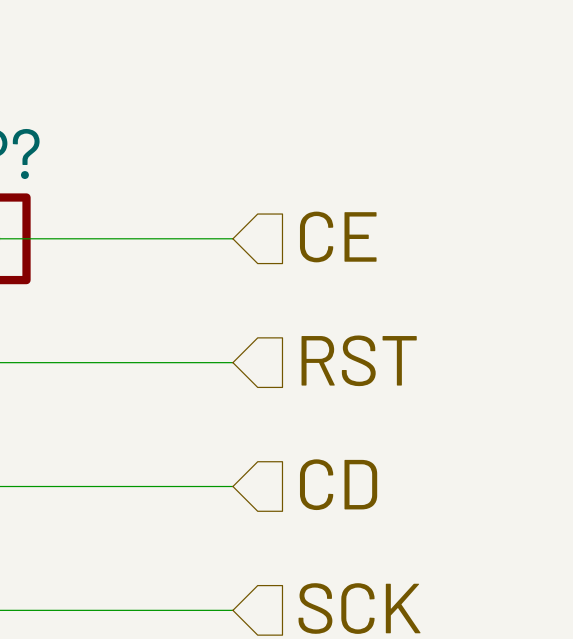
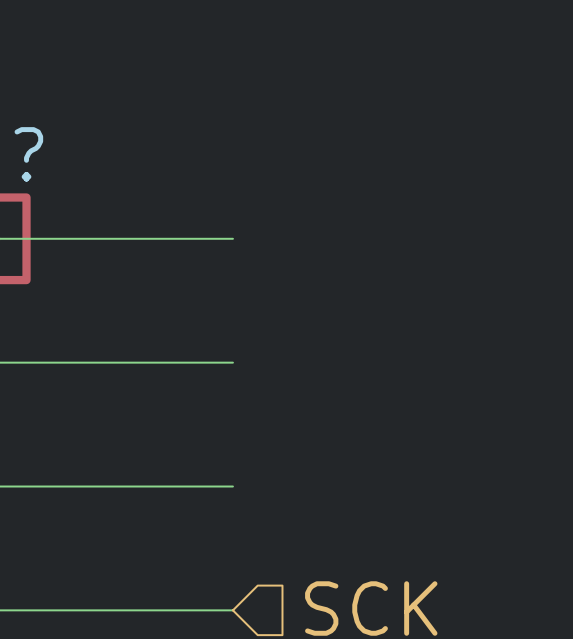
hierarchical label: CE (338, 236) -> none
hierarchical label: RST (359, 360) -> none
hierarchical label: CD (338, 484) -> none

